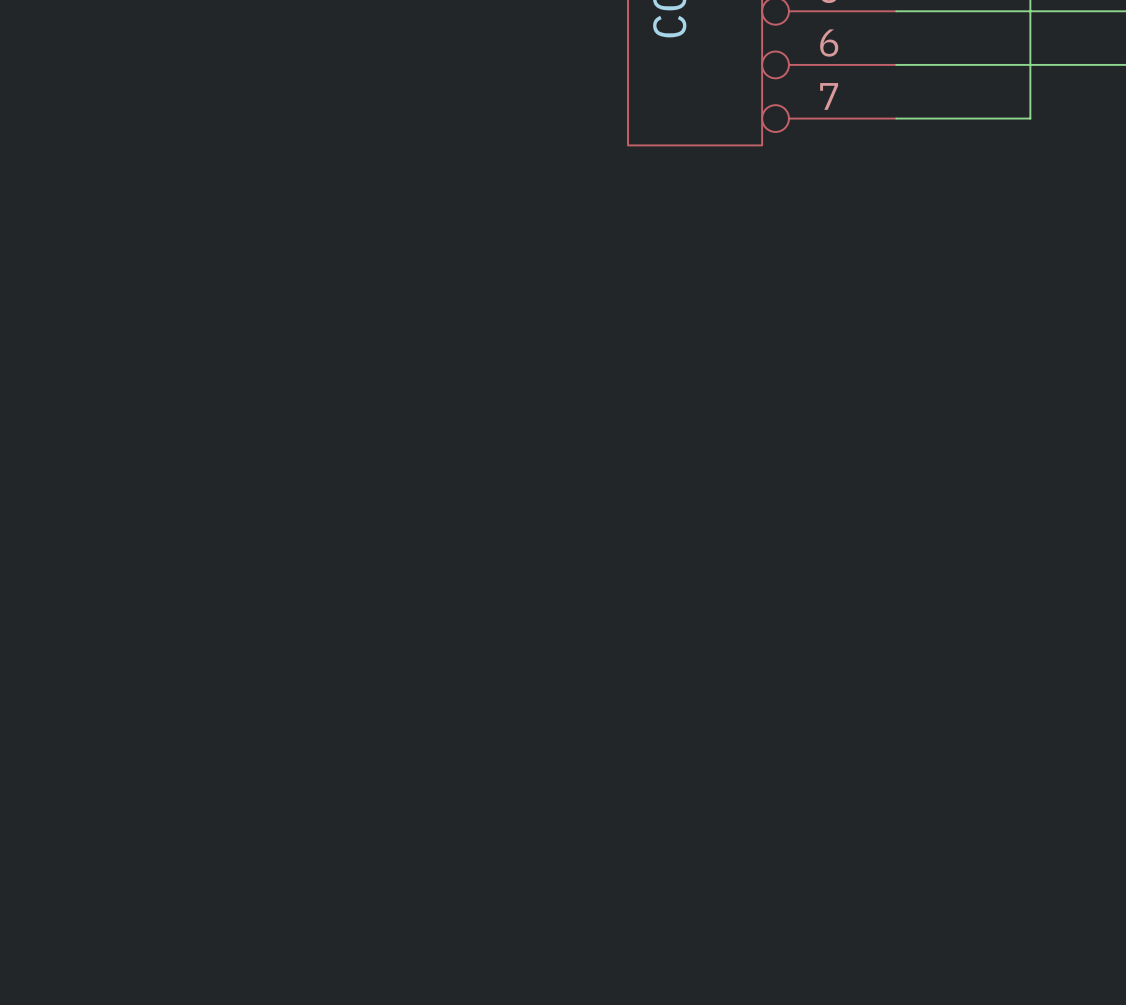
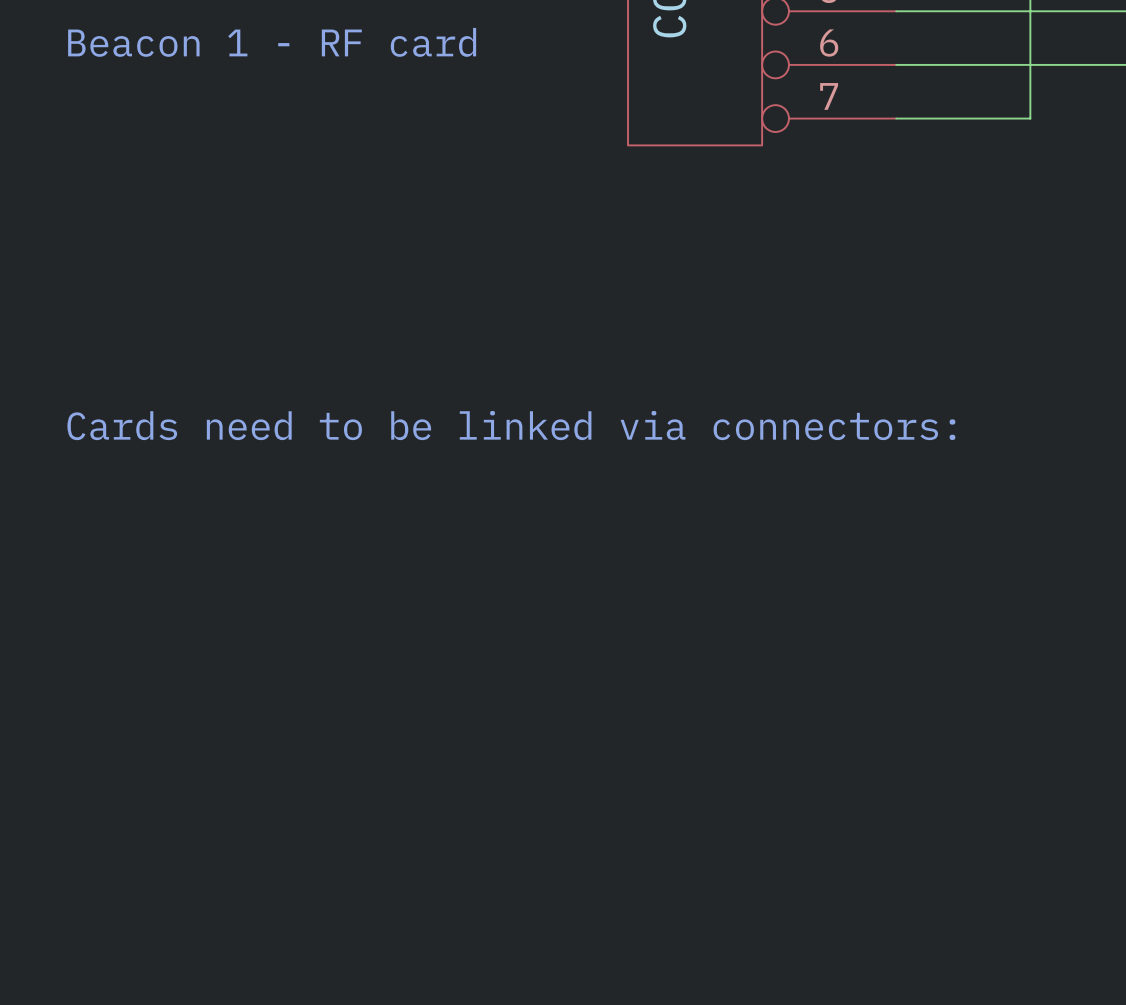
text: none -> Beacon 1 - RF card (272, 42)
text: none -> Cards need to be linked via connectors: (511, 425)

